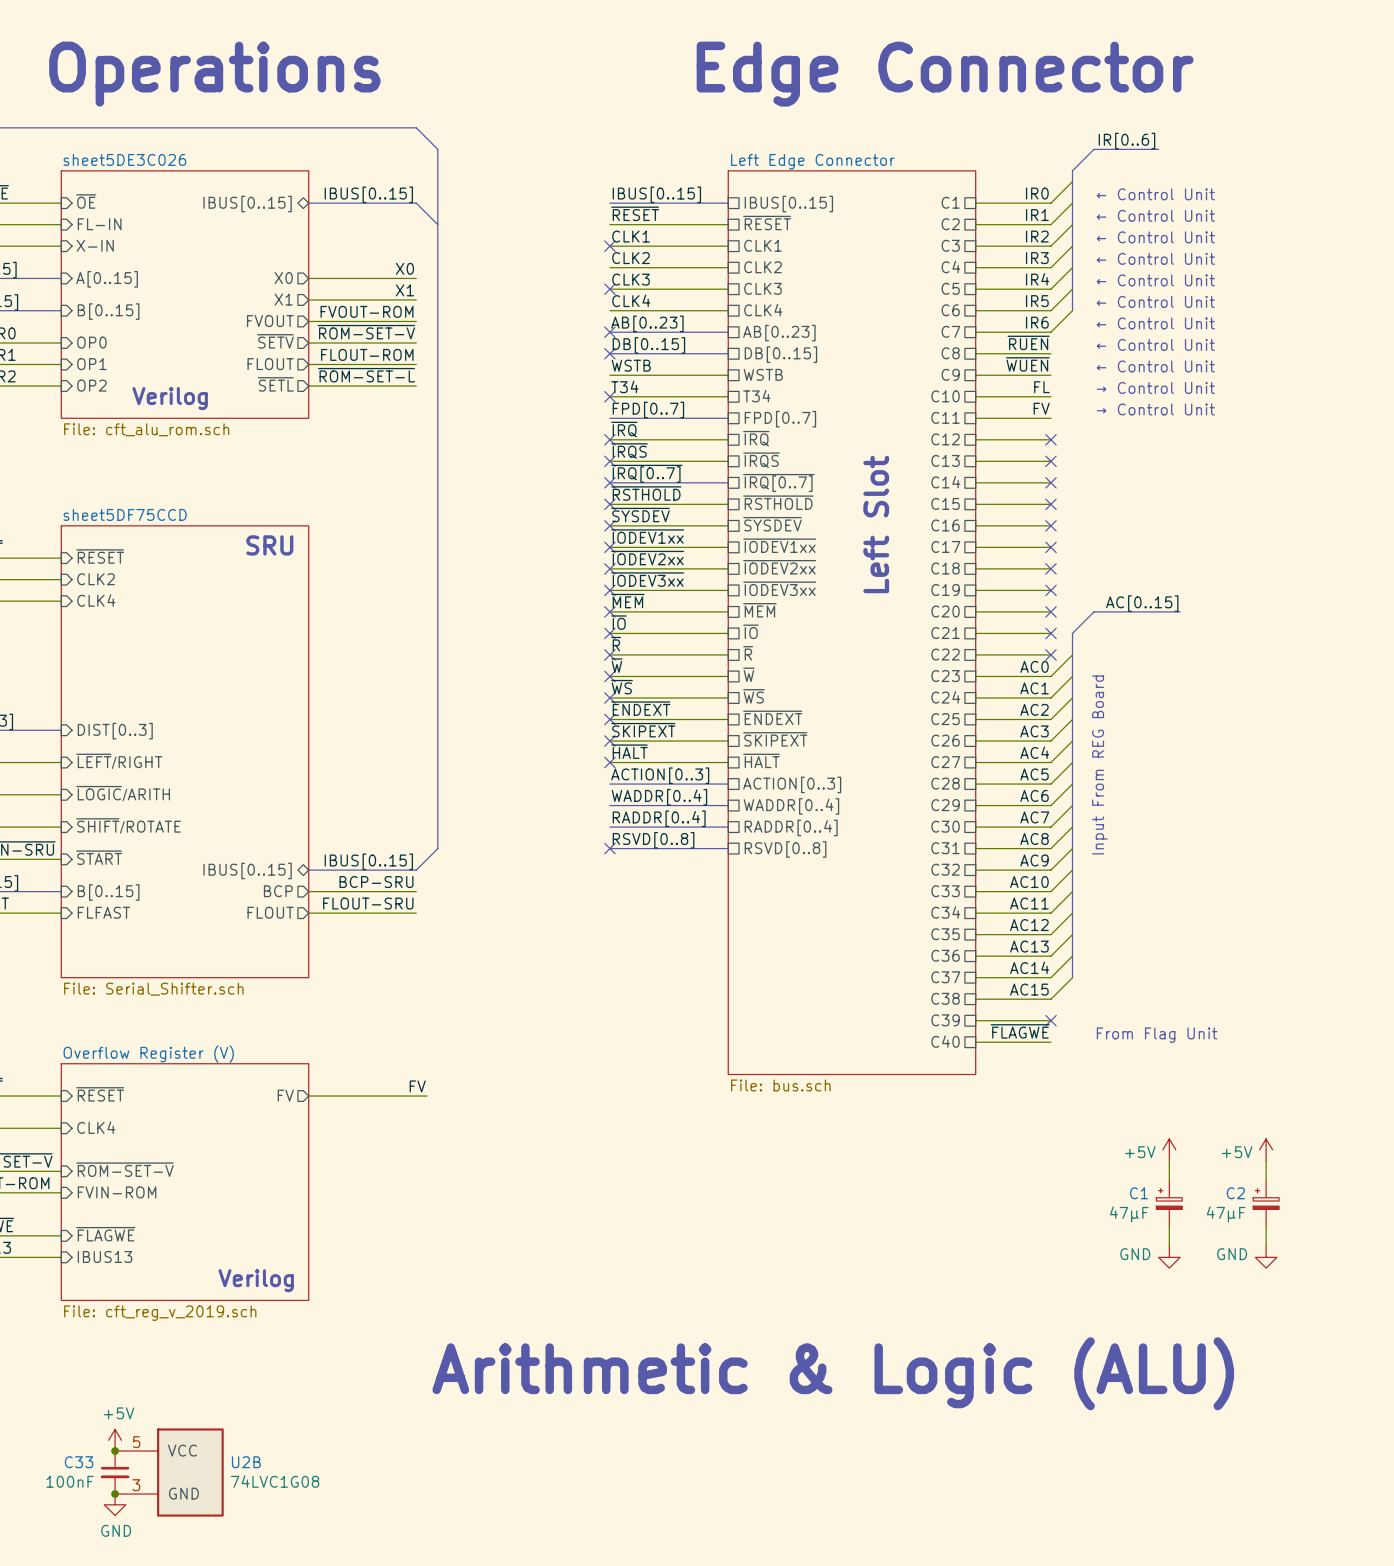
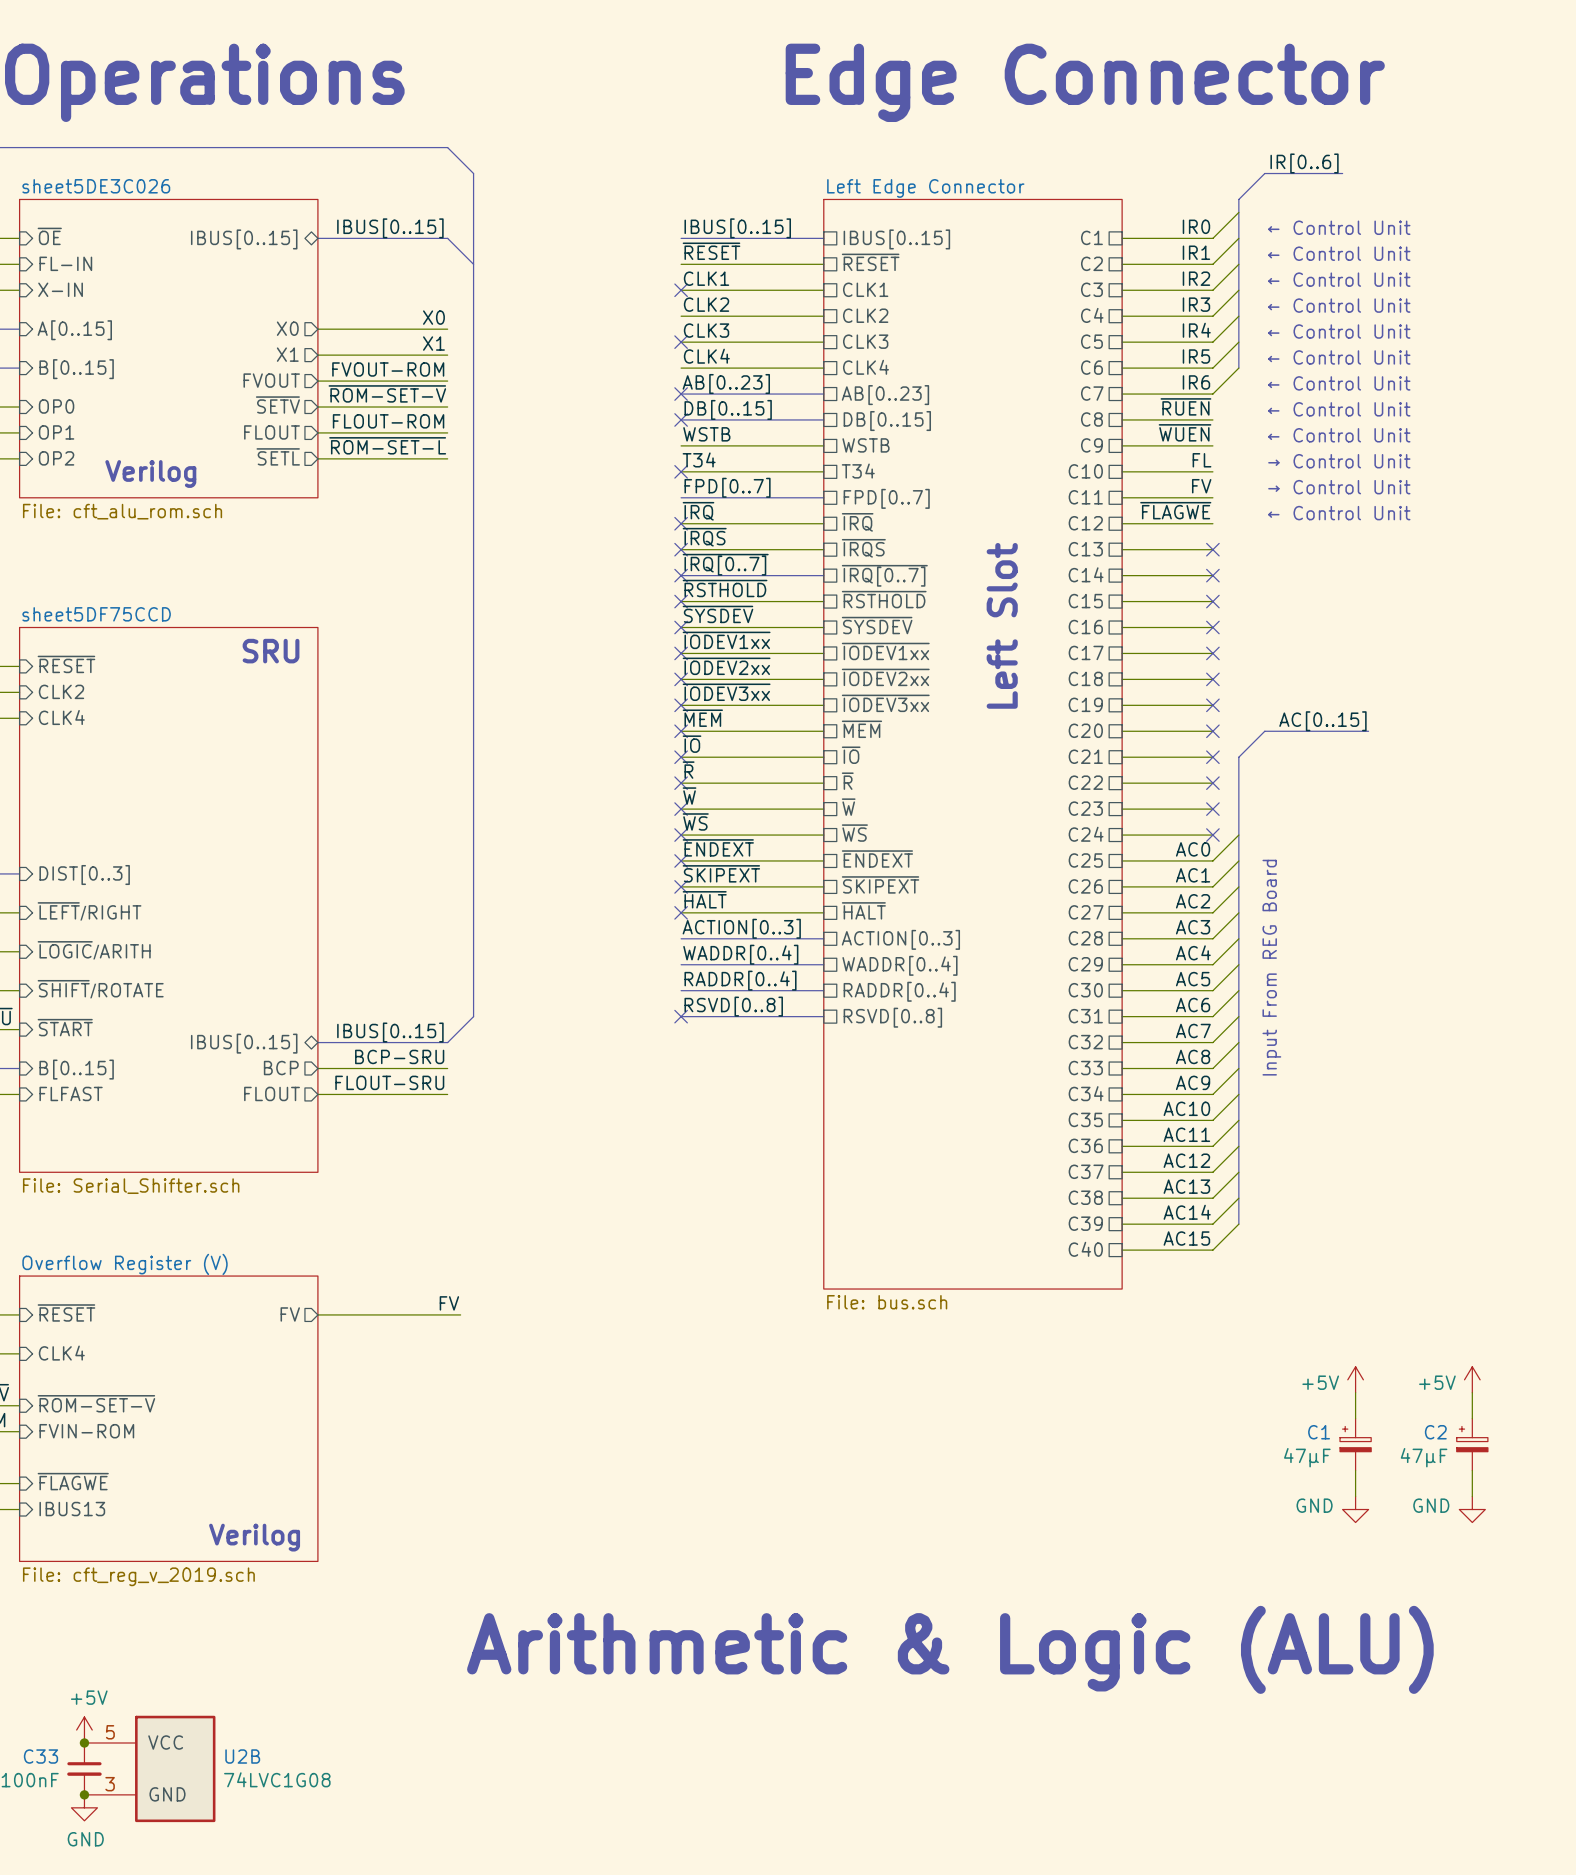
label: none -> ~{FLAGWE} (1175, 510)
text: none -> ← Control Unit (1339, 513)
no-connect mark: (1050, 439) -> none
wire: (1072, 654) (1050, 676) -> none
label: AC0 (1034, 666) -> none
no-connect mark: none -> (1212, 809)
wire: (1072, 676) (1050, 697) -> none
label: AC1 (1034, 688) -> none
no-connect mark: none -> (1212, 835)
label: AC2 (1034, 709) -> AC0 (1193, 849)
label: AC3 (1034, 731) -> AC1 (1193, 875)
label: AC4 (1034, 752) -> AC2 (1193, 901)
text position: Input From REG Board (1099, 764) -> Input From REG Board (1271, 967)
label: AC5 (1034, 774) -> AC3 (1193, 927)
label: AC6 (1034, 795) -> AC4 (1193, 952)
label: AC7 (1034, 817) -> AC5 (1193, 979)
label: AC8 (1034, 838) -> AC6 (1193, 1005)
label: AC9 (1034, 860) -> AC7 (1193, 1030)
label: AC10 (1029, 882) -> AC8 (1193, 1056)
label: AC11 (1029, 903) -> AC9 (1193, 1082)
label: AC12 (1029, 925) -> AC10 (1186, 1108)
label: AC13 (1029, 946) -> AC11 (1186, 1134)
label: AC14 (1029, 967) -> AC12 (1186, 1160)
bus: none -> (1238, 1172) (1238, 1224)
label: AC15 (1029, 989) -> AC13 (1186, 1186)
wire: none -> (1238, 1198) (1212, 1224)
label: none -> AC14 (1187, 1212)
no-connect mark: (1050, 1020) -> none
wire: none -> (1238, 1224) (1212, 1250)
label: ~{FLAGWE} (1020, 1031) -> AC15 (1186, 1238)
text: From Flag Unit (1157, 1035) -> none

